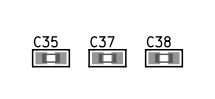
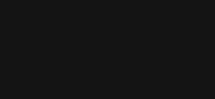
C35: (50, 58) -> none
C37: (107, 58) -> none
C38: (163, 58) -> none

